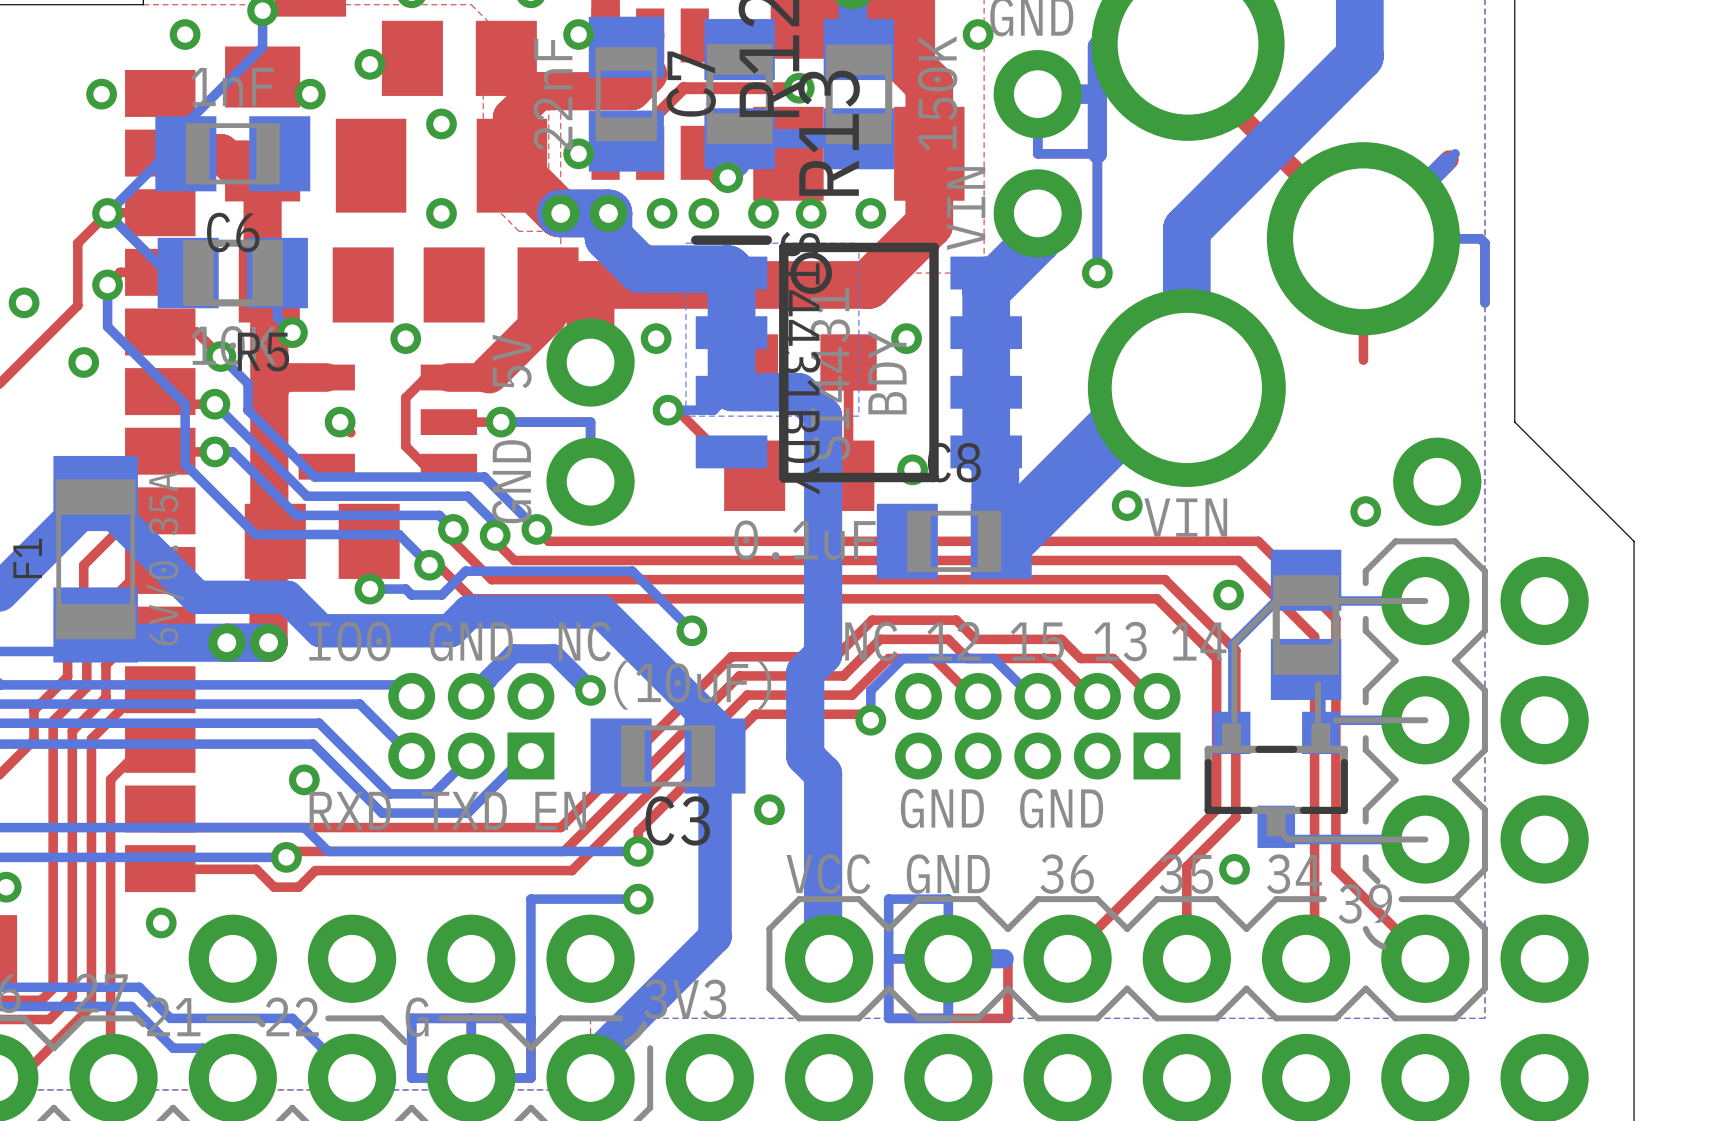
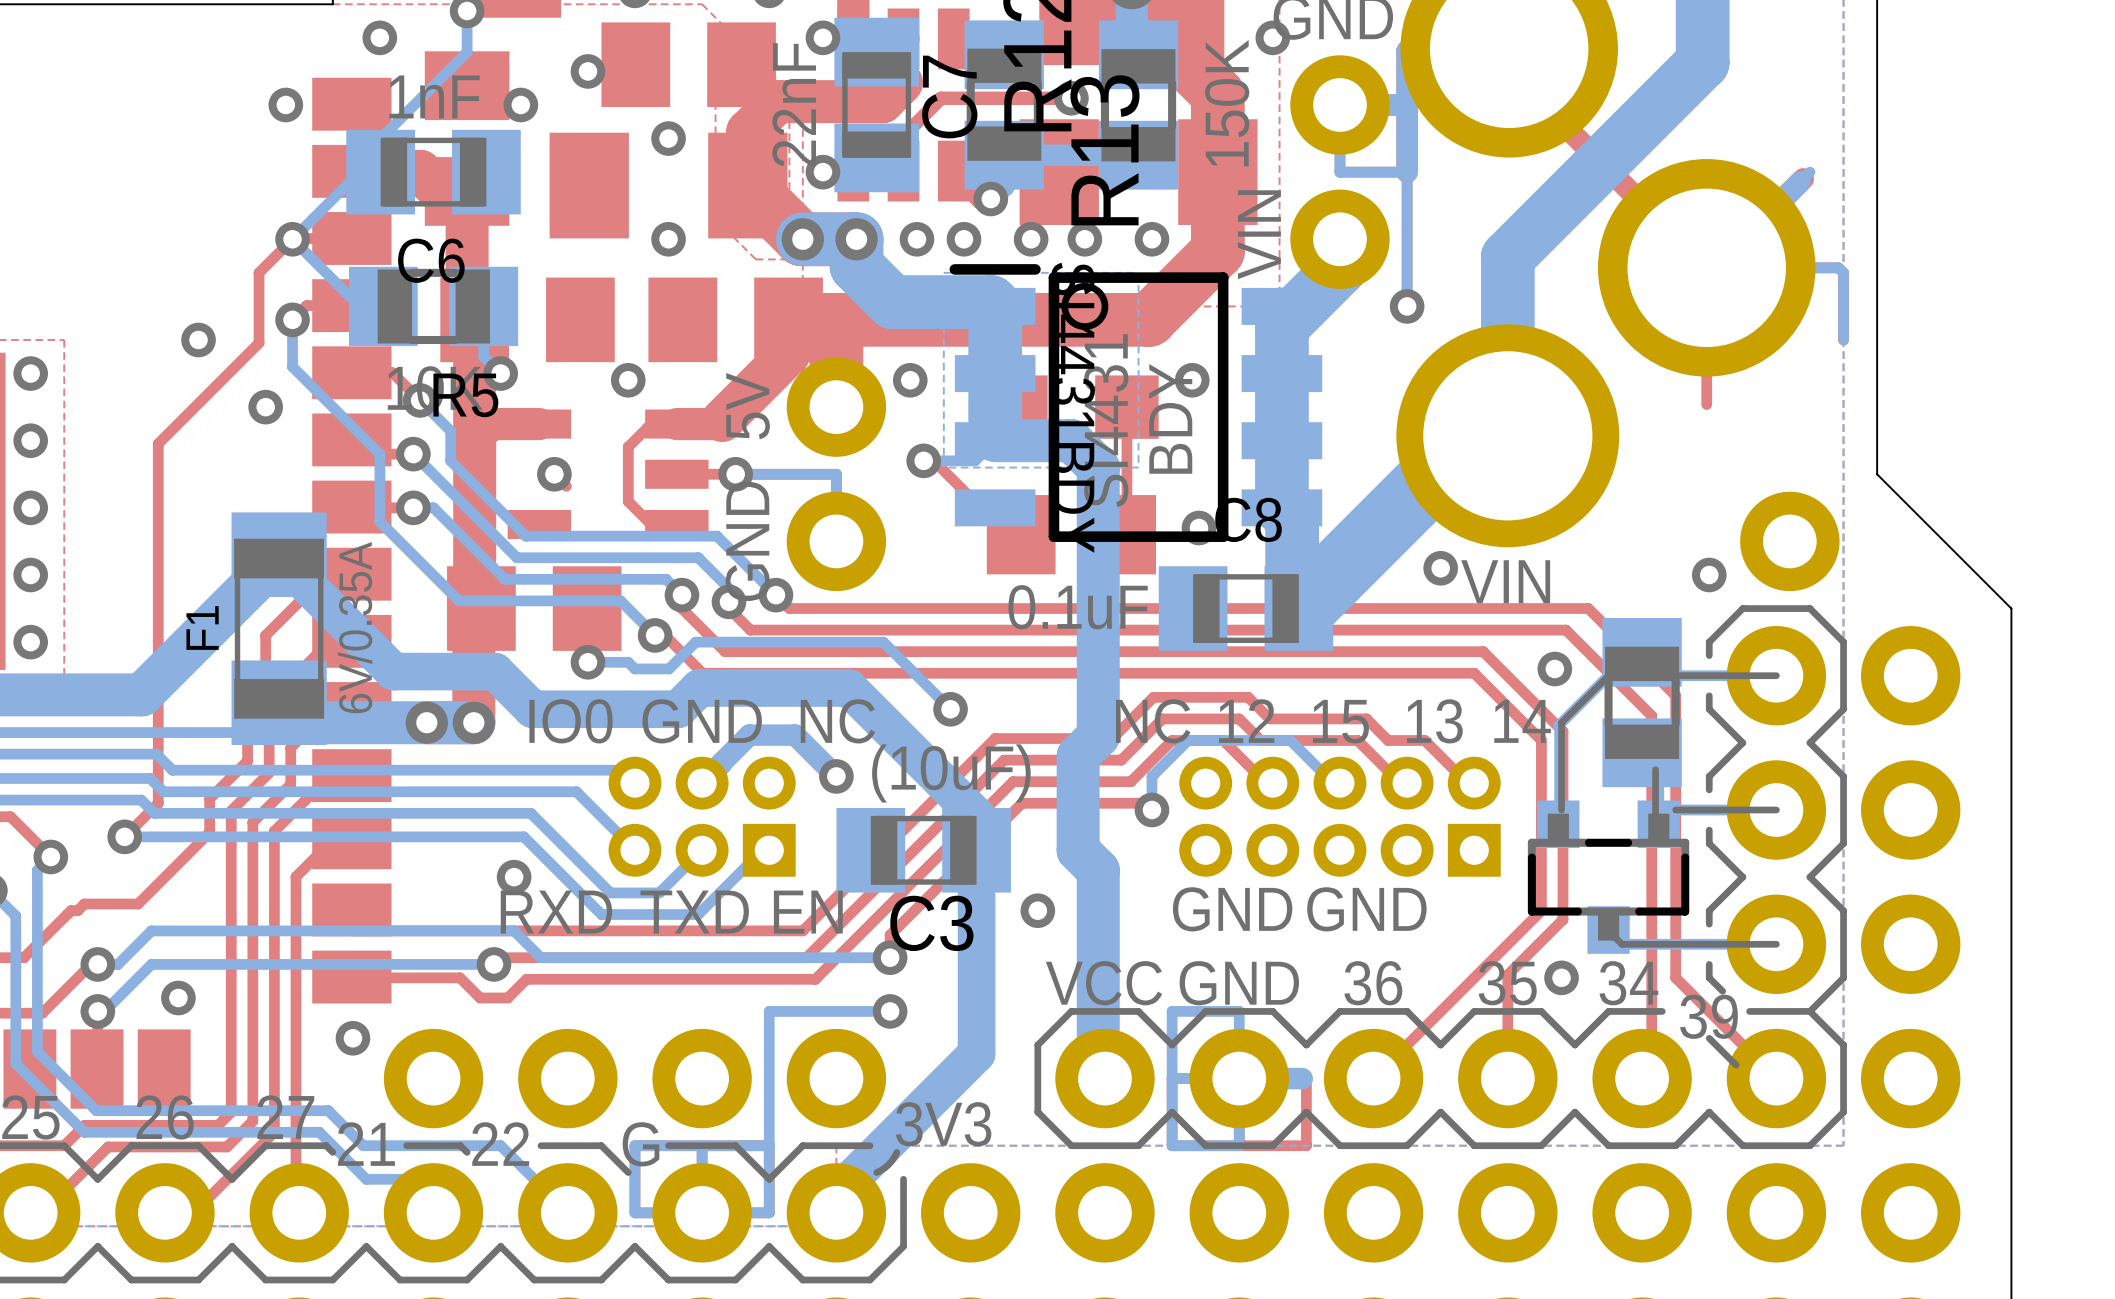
line: none -> (1709, 1038) (1736, 1065)
line: (1365, 928) (1372, 939) (1383, 946) -> none

